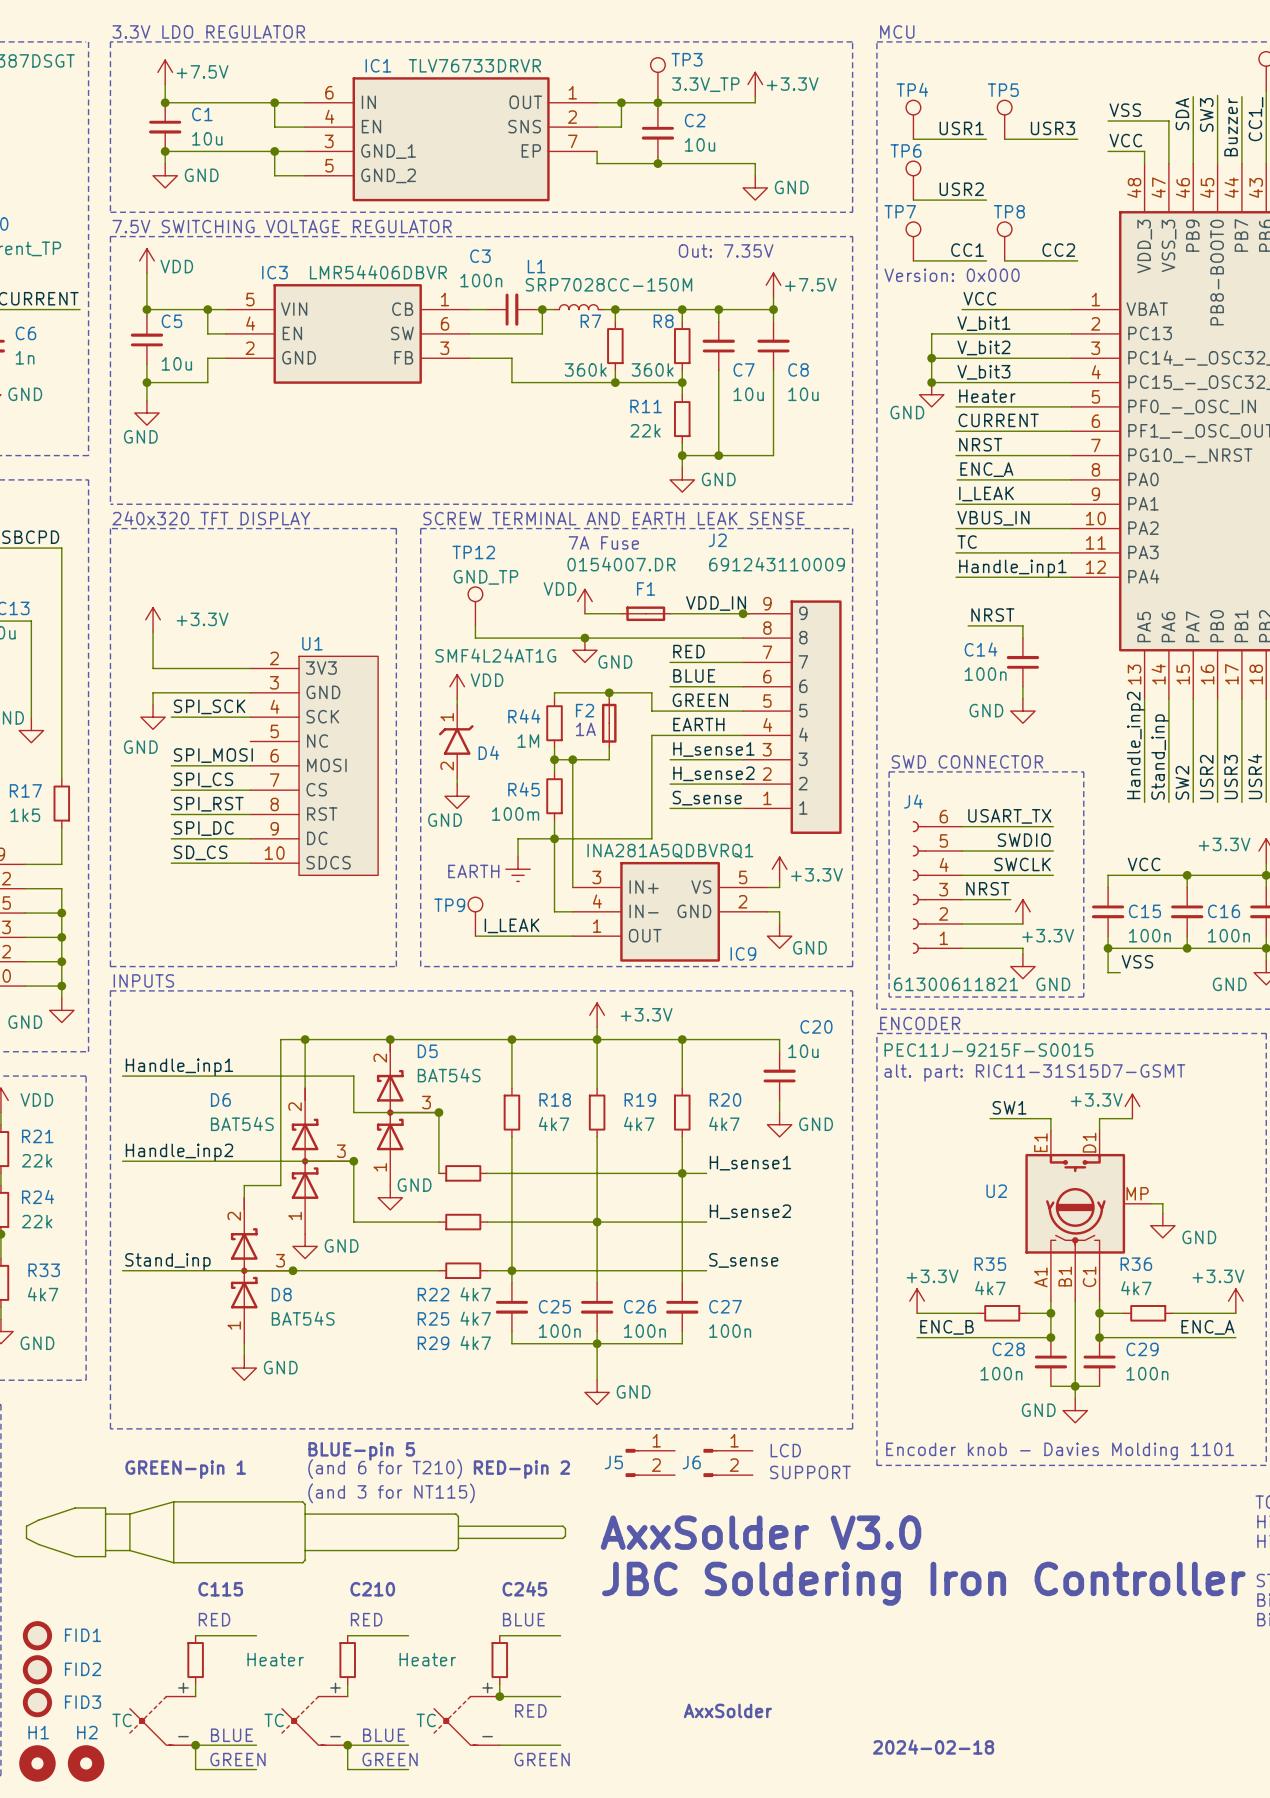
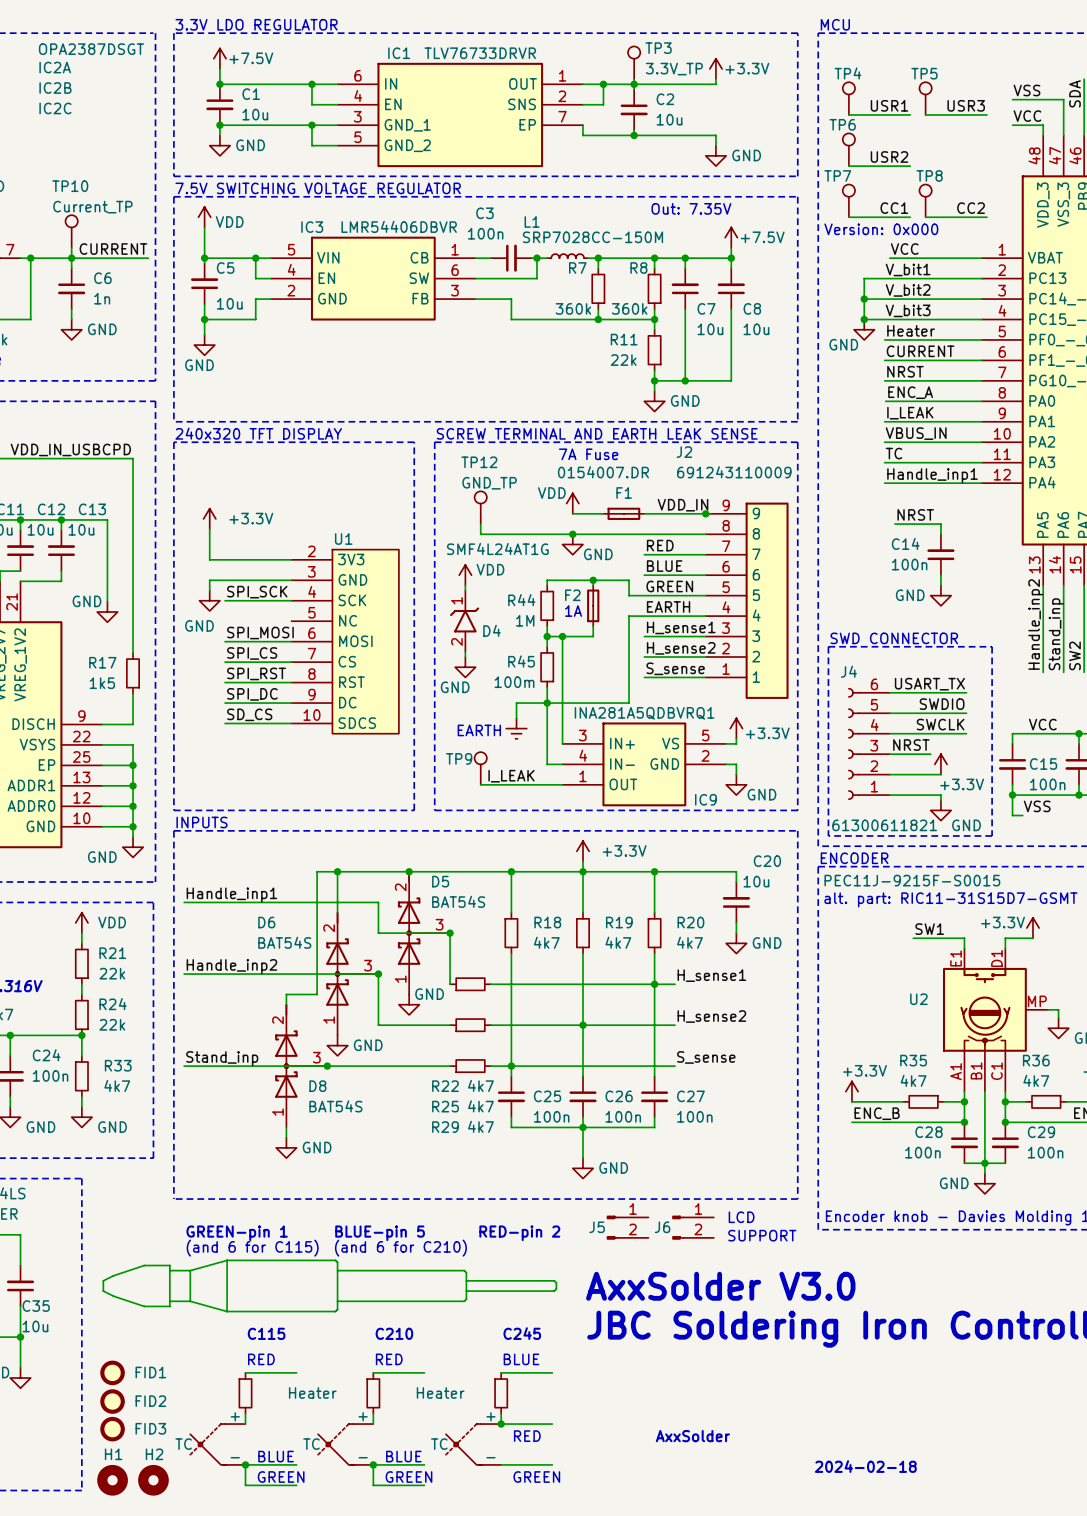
text: BLUE-pin 5 (361, 1451) -> none
text: (and 6 for T210) (385, 1469) -> BLUE-pin 5 (380, 1233)
text: none -> (and 6 for C115) (252, 1248)
text: (and 3 for NT115) (391, 1493) -> (and 6 for C210) (400, 1248)

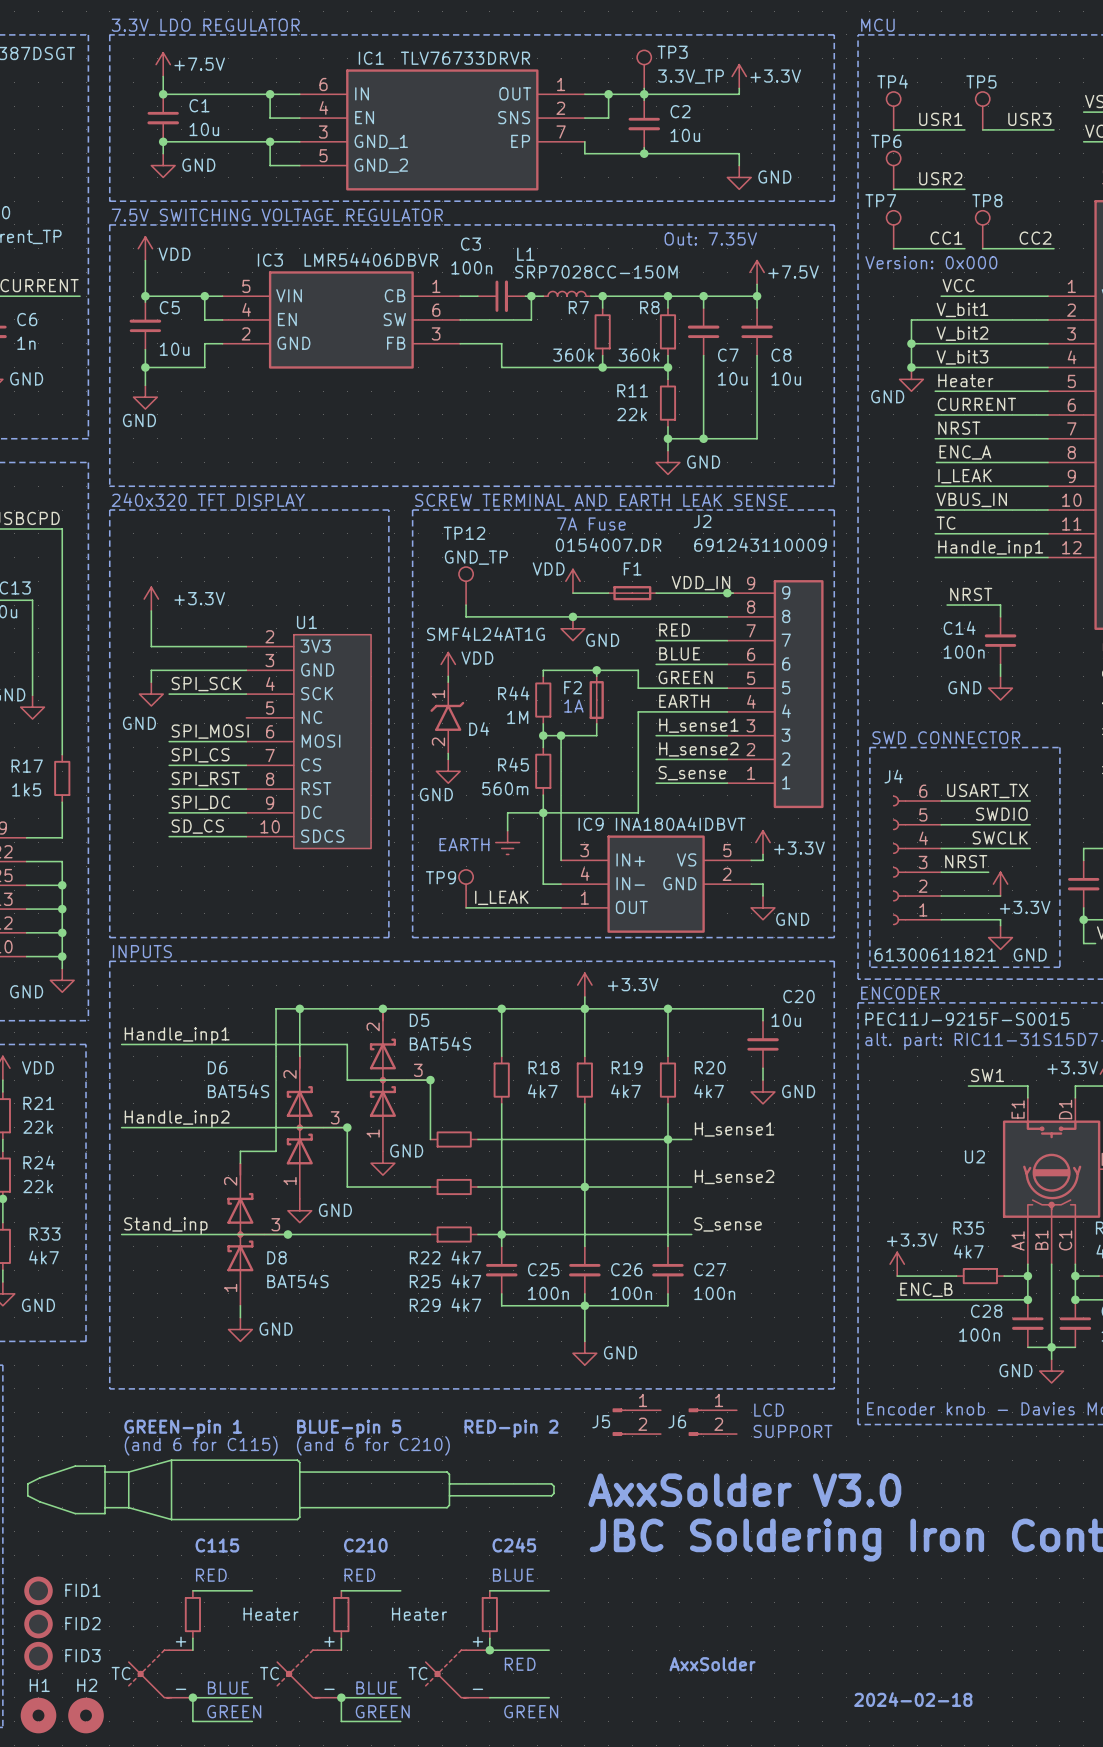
R45 value: 100m (514, 682) -> 560m (505, 788)
IC9 value: INA281A5QDBVRQ1 (644, 713) -> INA180A4IDBVT (680, 824)
IC9 name position: IC9 (705, 799) -> IC9 (591, 824)

